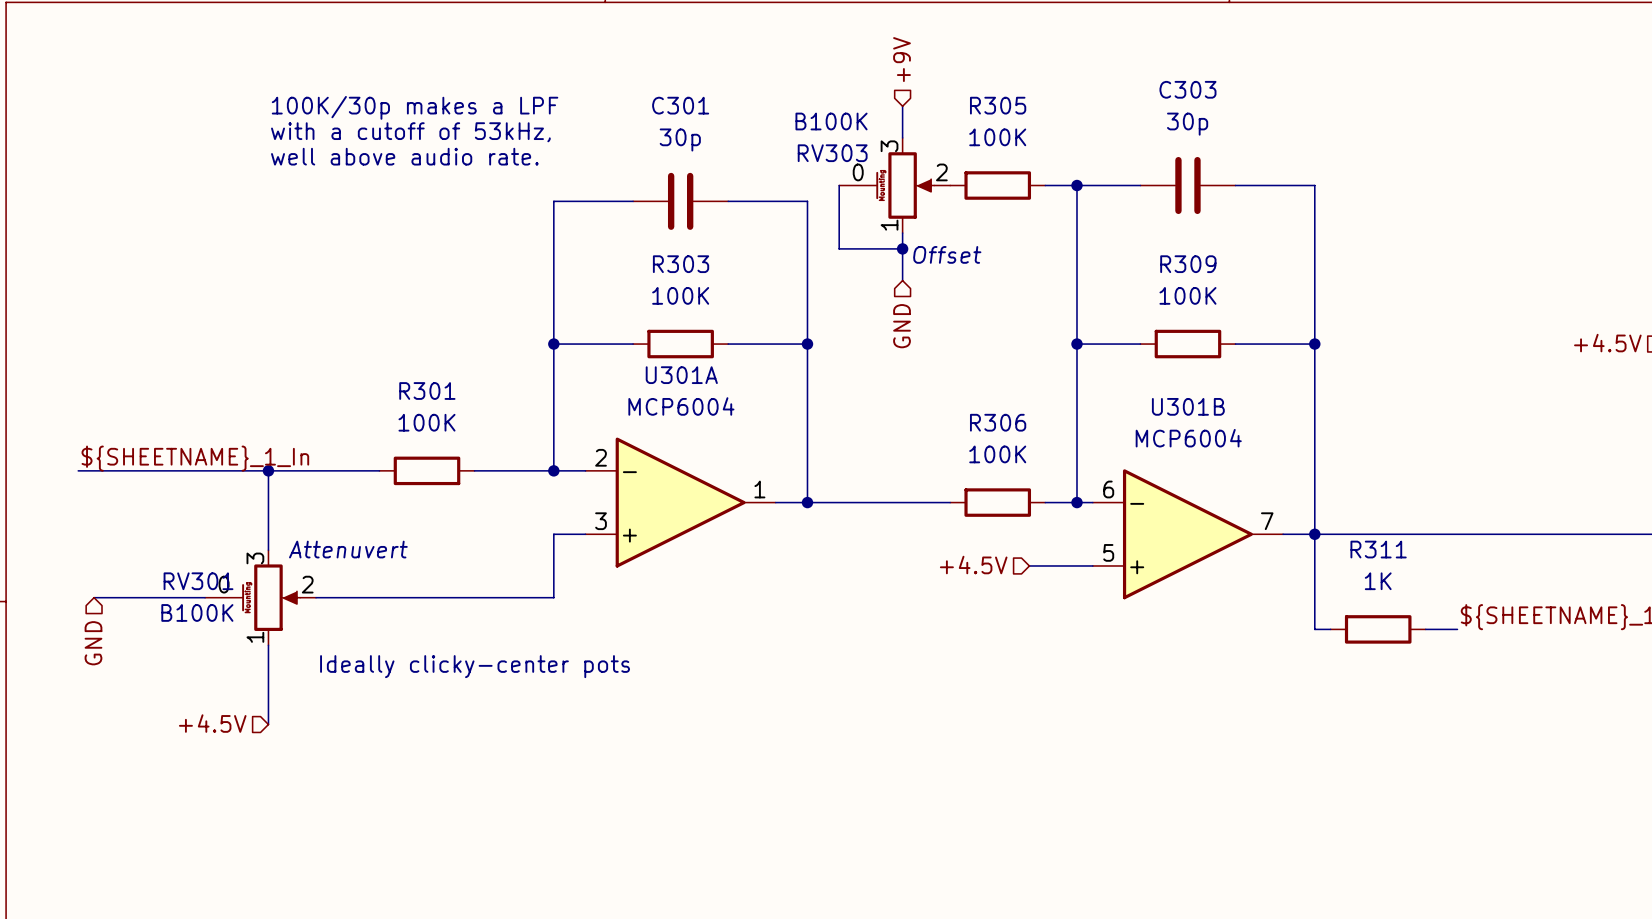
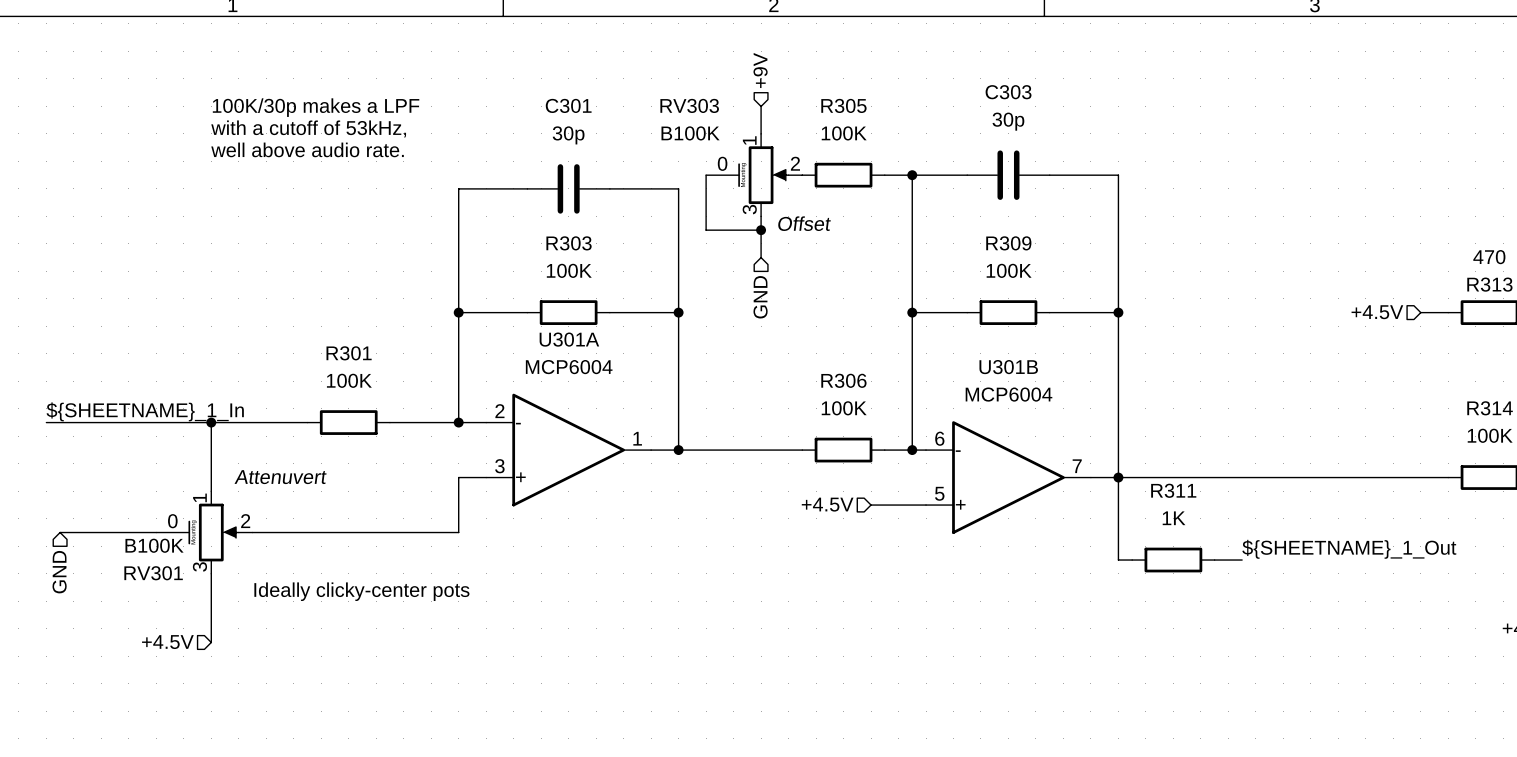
RV303 name position: RV303 (832, 153) -> RV303 (689, 105)
RV303 flip: as is (905, 185) -> up-down (763, 175)
RV301 name position: RV301 (198, 581) -> RV301 (153, 573)
RV301 flip: as is (271, 597) -> up-down (213, 532)

